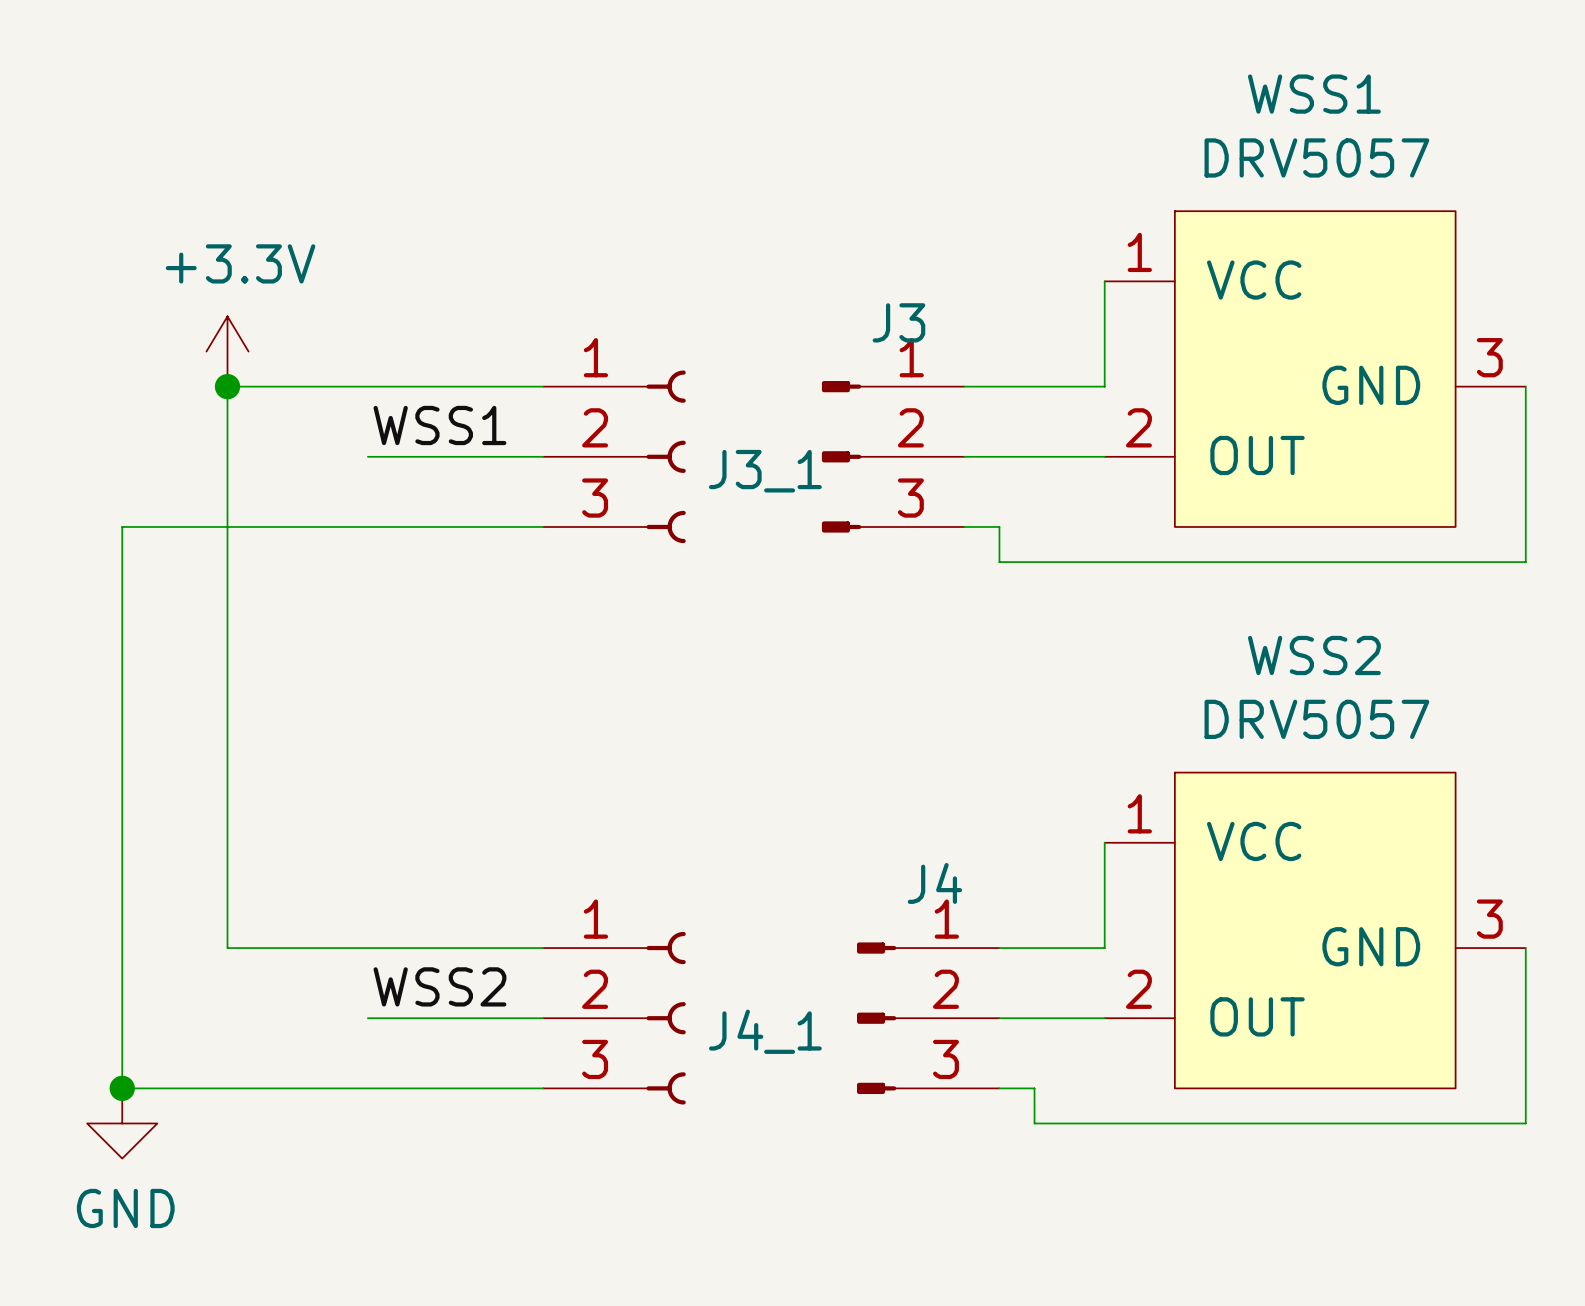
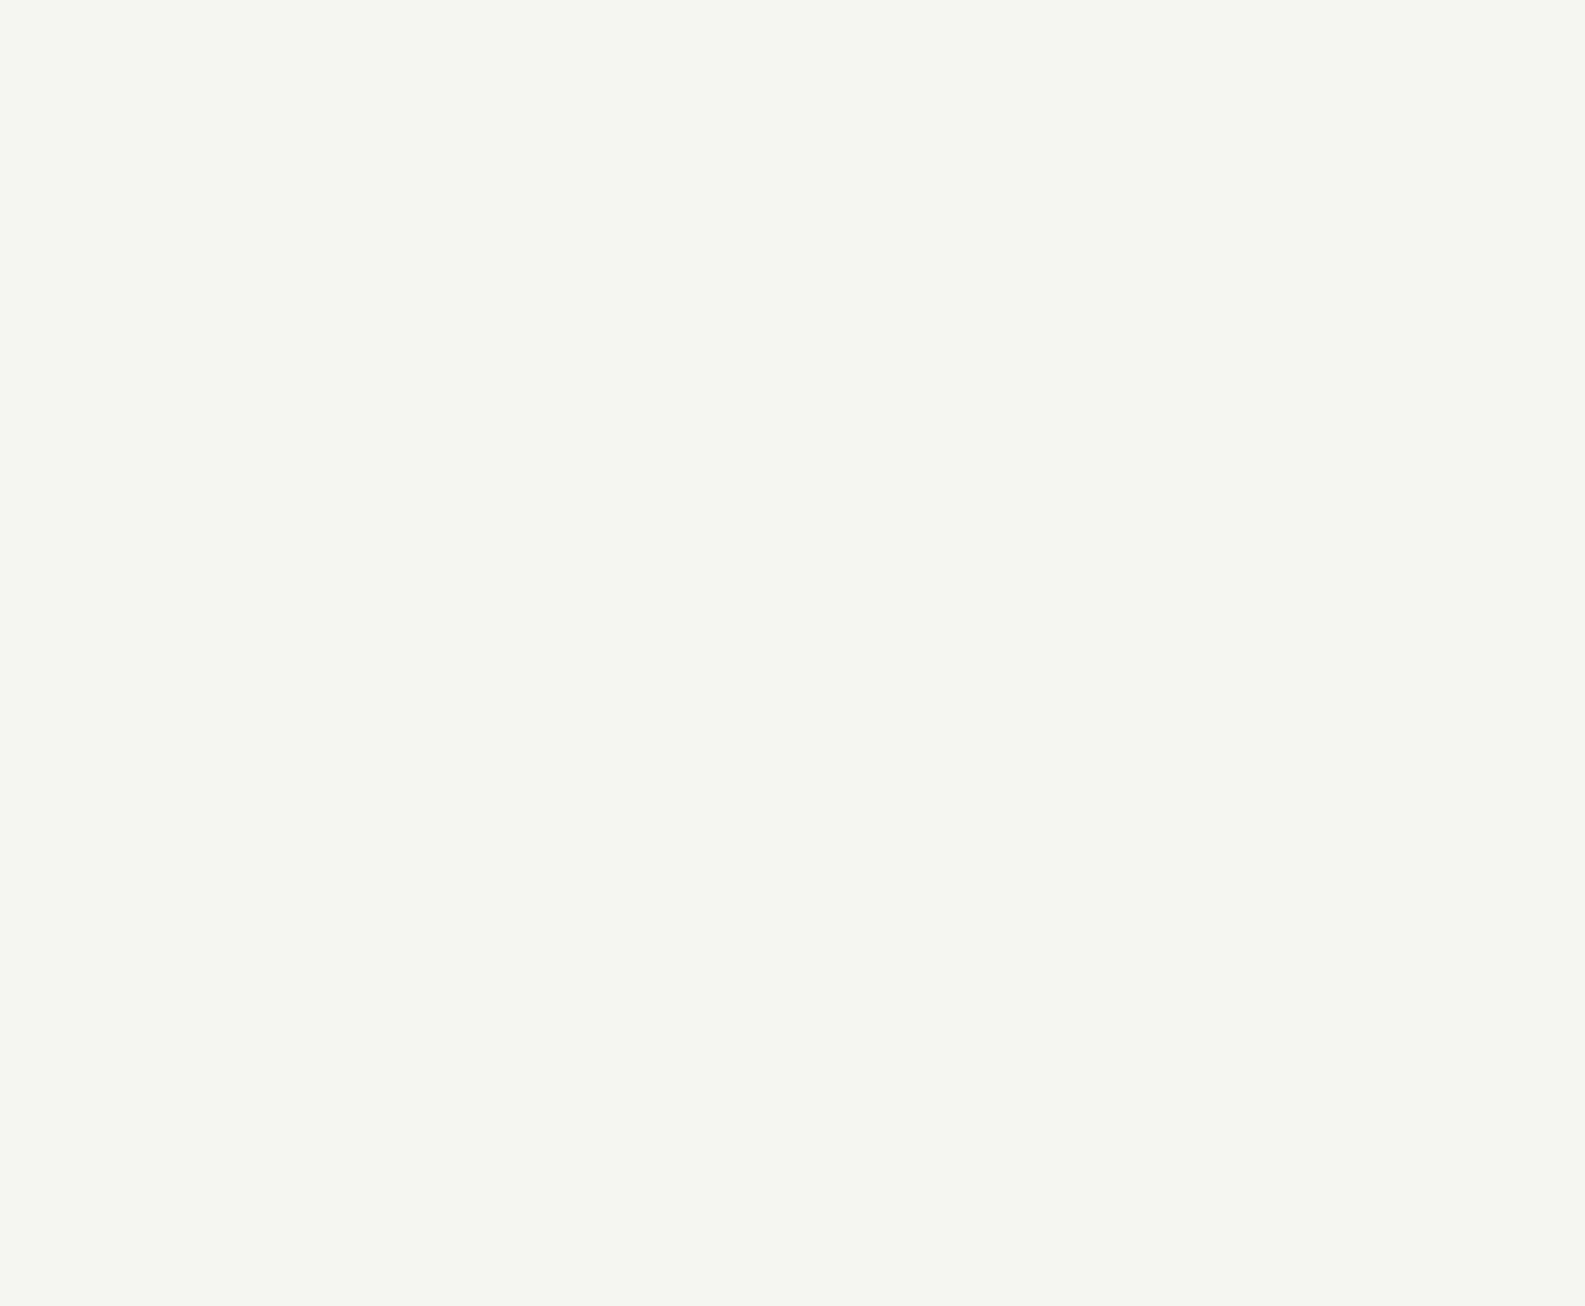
wire: (1104, 281) (1104, 386) (964, 386) -> none
power symbol: +3.3V (227, 351) -> none
WSS1: DRV5057 (1315, 369) -> none
junction: (227, 386) -> none
wire: (543, 386) (227, 386) (227, 948) (543, 948) -> none
wire: (1525, 386) (1525, 562) (999, 562) (999, 526) (964, 526) -> none
label: WSS1 (439, 425) -> none
wire: (367, 456) (543, 456) -> none
J3_1: (614, 456) -> none
J3: (893, 456) -> none
wire: (964, 456) (1104, 456) -> none
wire: (543, 526) (122, 526) (122, 1088) (543, 1088) -> none
wire: (1104, 842) (1104, 948) (999, 948) -> none
WSS2: DRV5057 (1315, 930) -> none
wire: (1525, 948) (1525, 1123) (1034, 1123) (1034, 1088) (999, 1088) -> none
label: WSS2 (439, 986) -> none
wire: (367, 1018) (543, 1018) -> none
J4_1: (614, 1018) -> none
J4: (928, 1018) -> none
wire: (999, 1018) (1104, 1018) -> none
junction: (122, 1088) -> none
power symbol: GND (122, 1123) -> none

